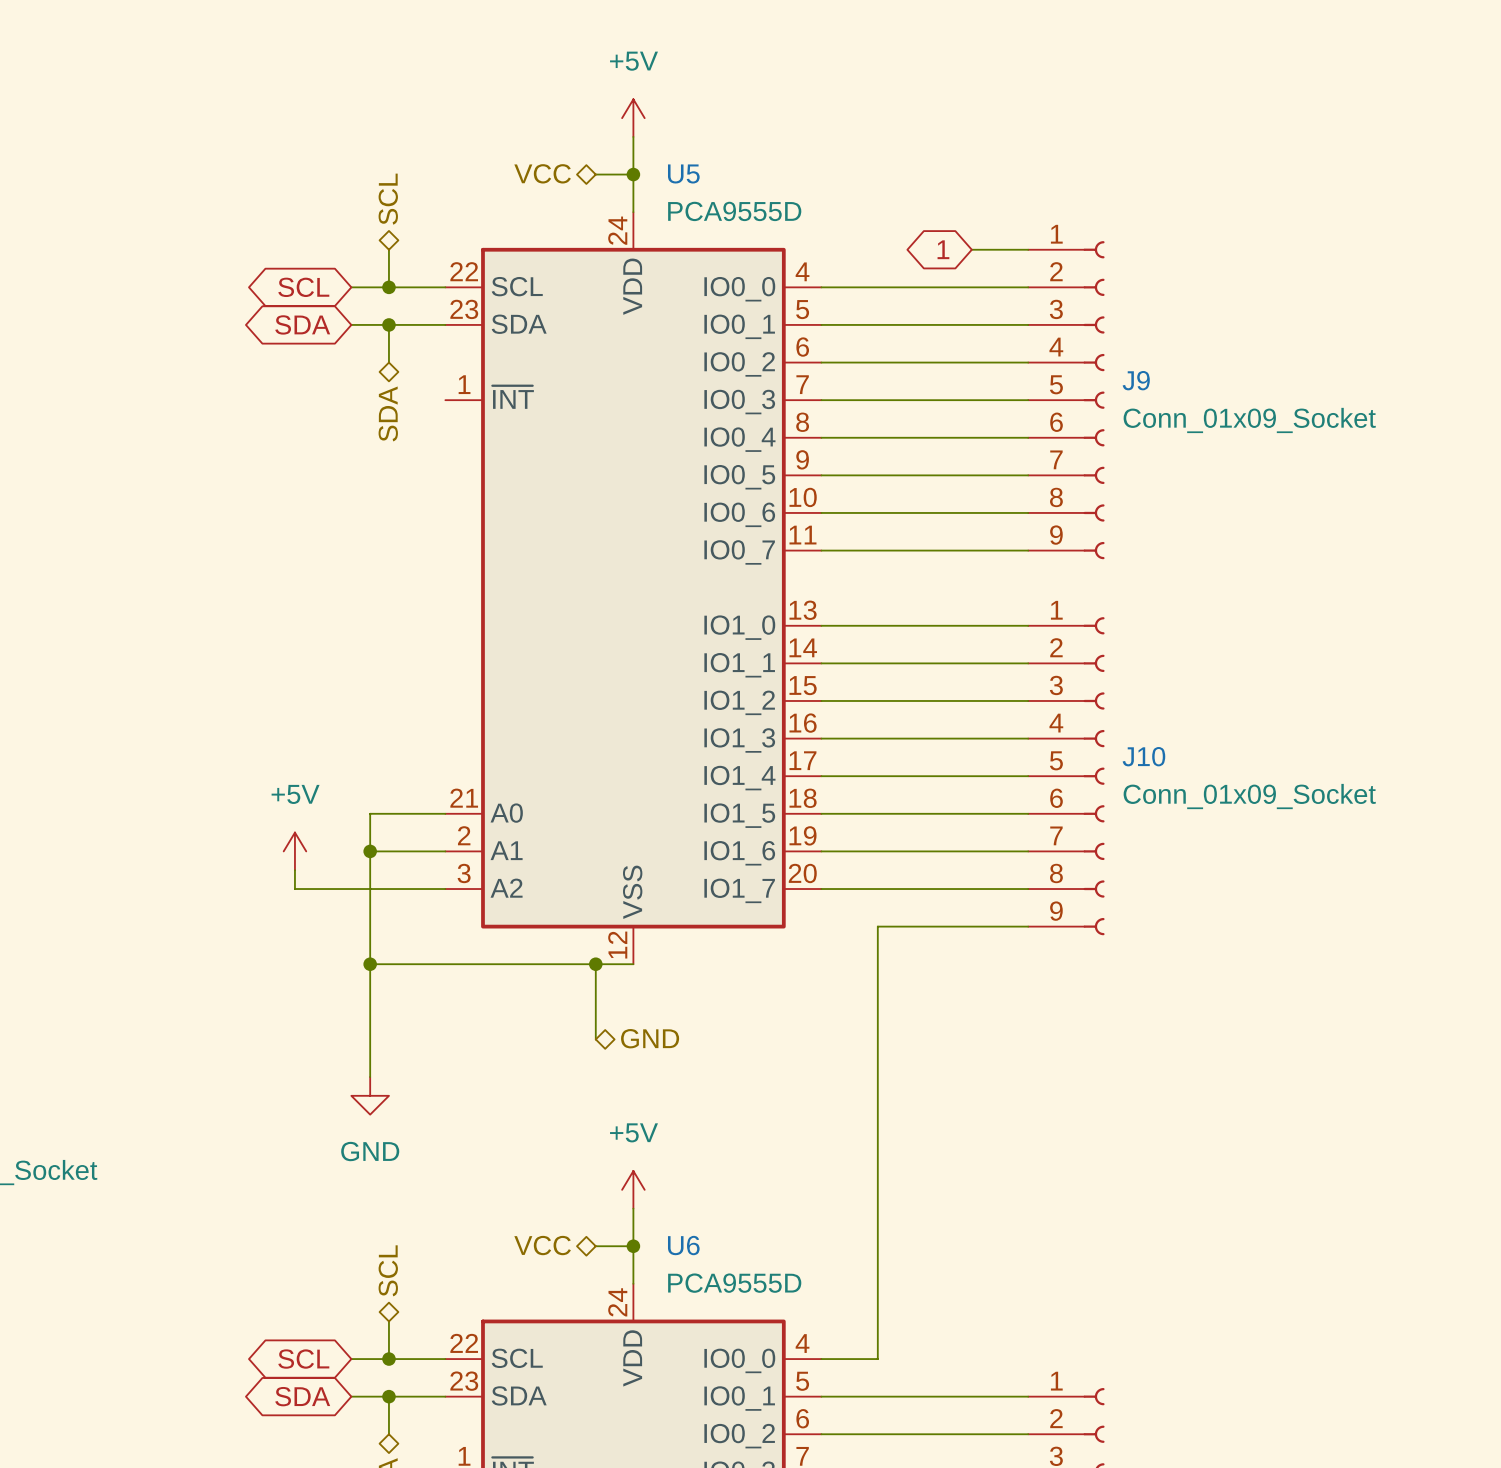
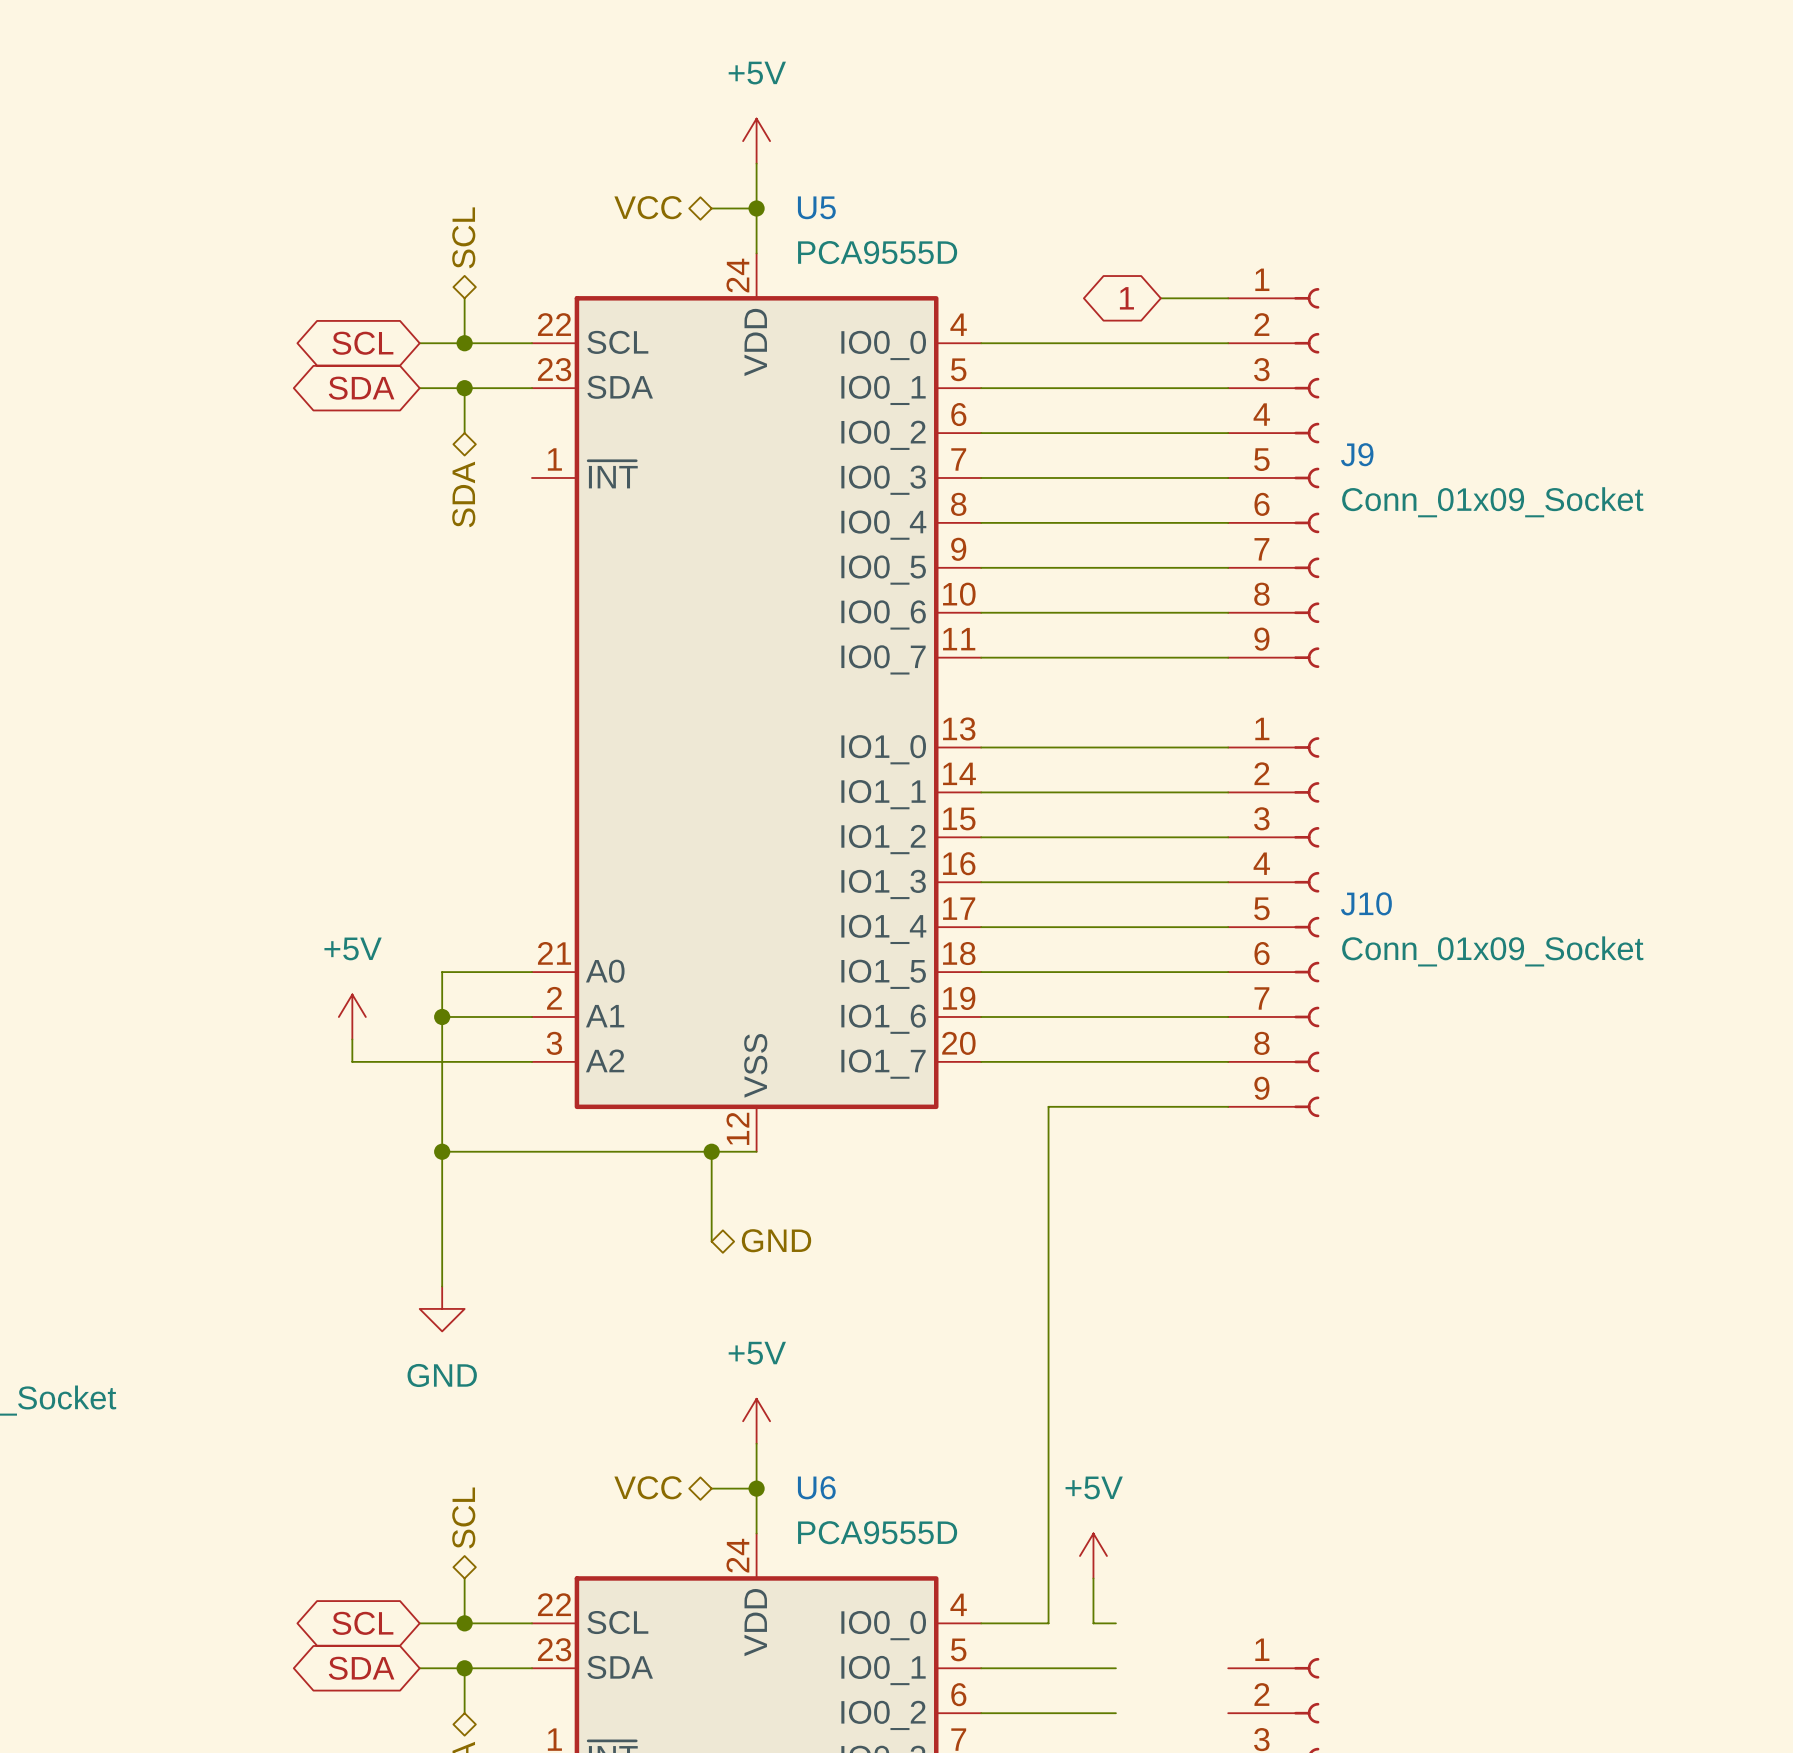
power symbol: none -> +5V (1093, 1555)
wire: none -> (1093, 1578) (1093, 1623) (1115, 1623)
wire: (934, 1396) (1028, 1396) -> none
wire: (934, 1434) (1028, 1434) -> none

